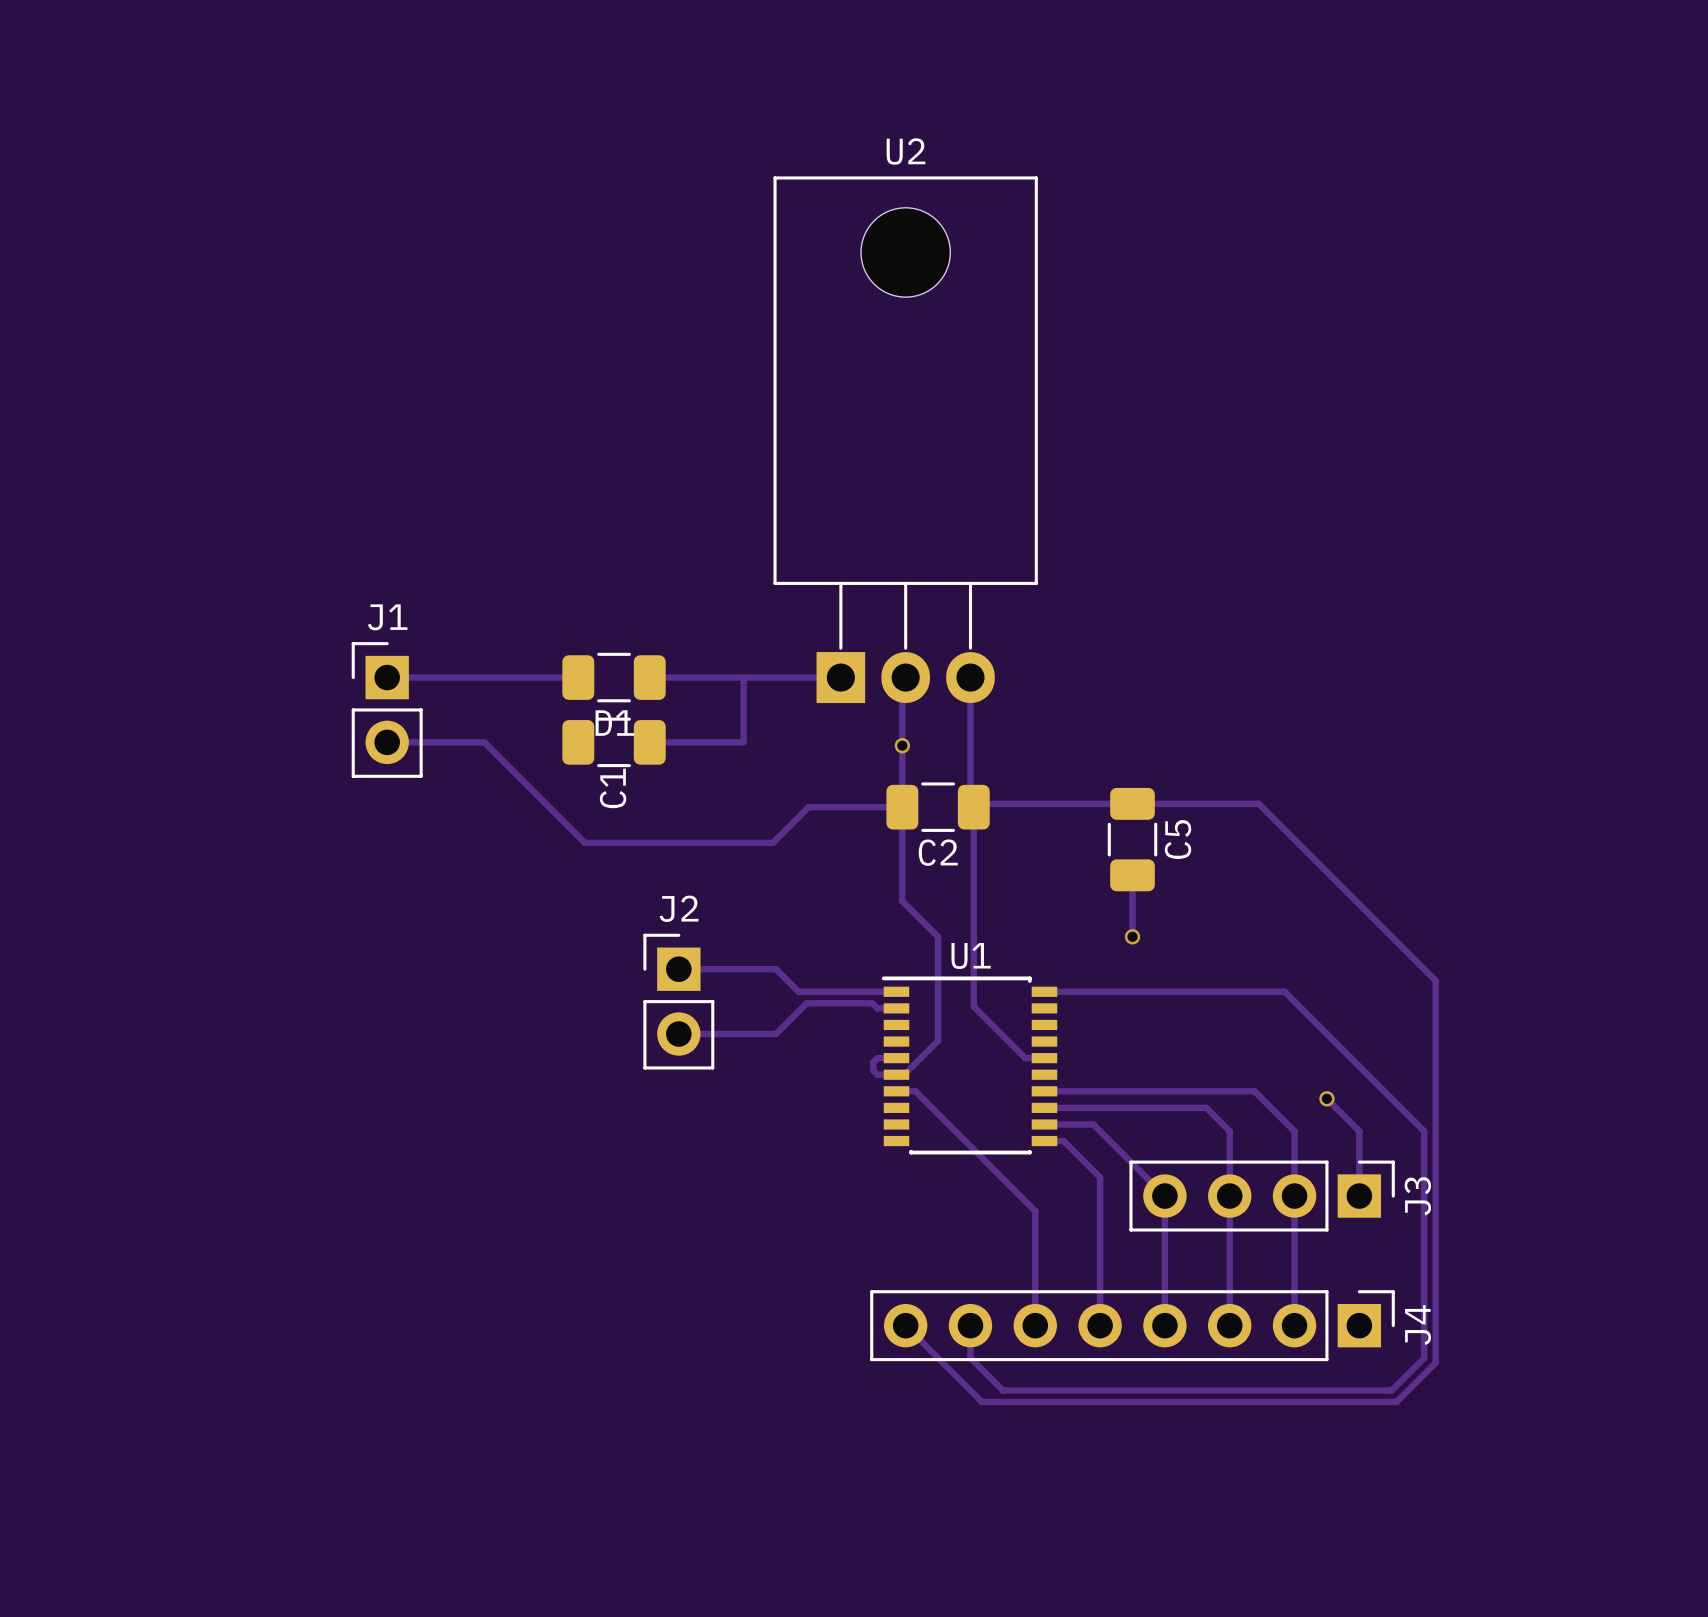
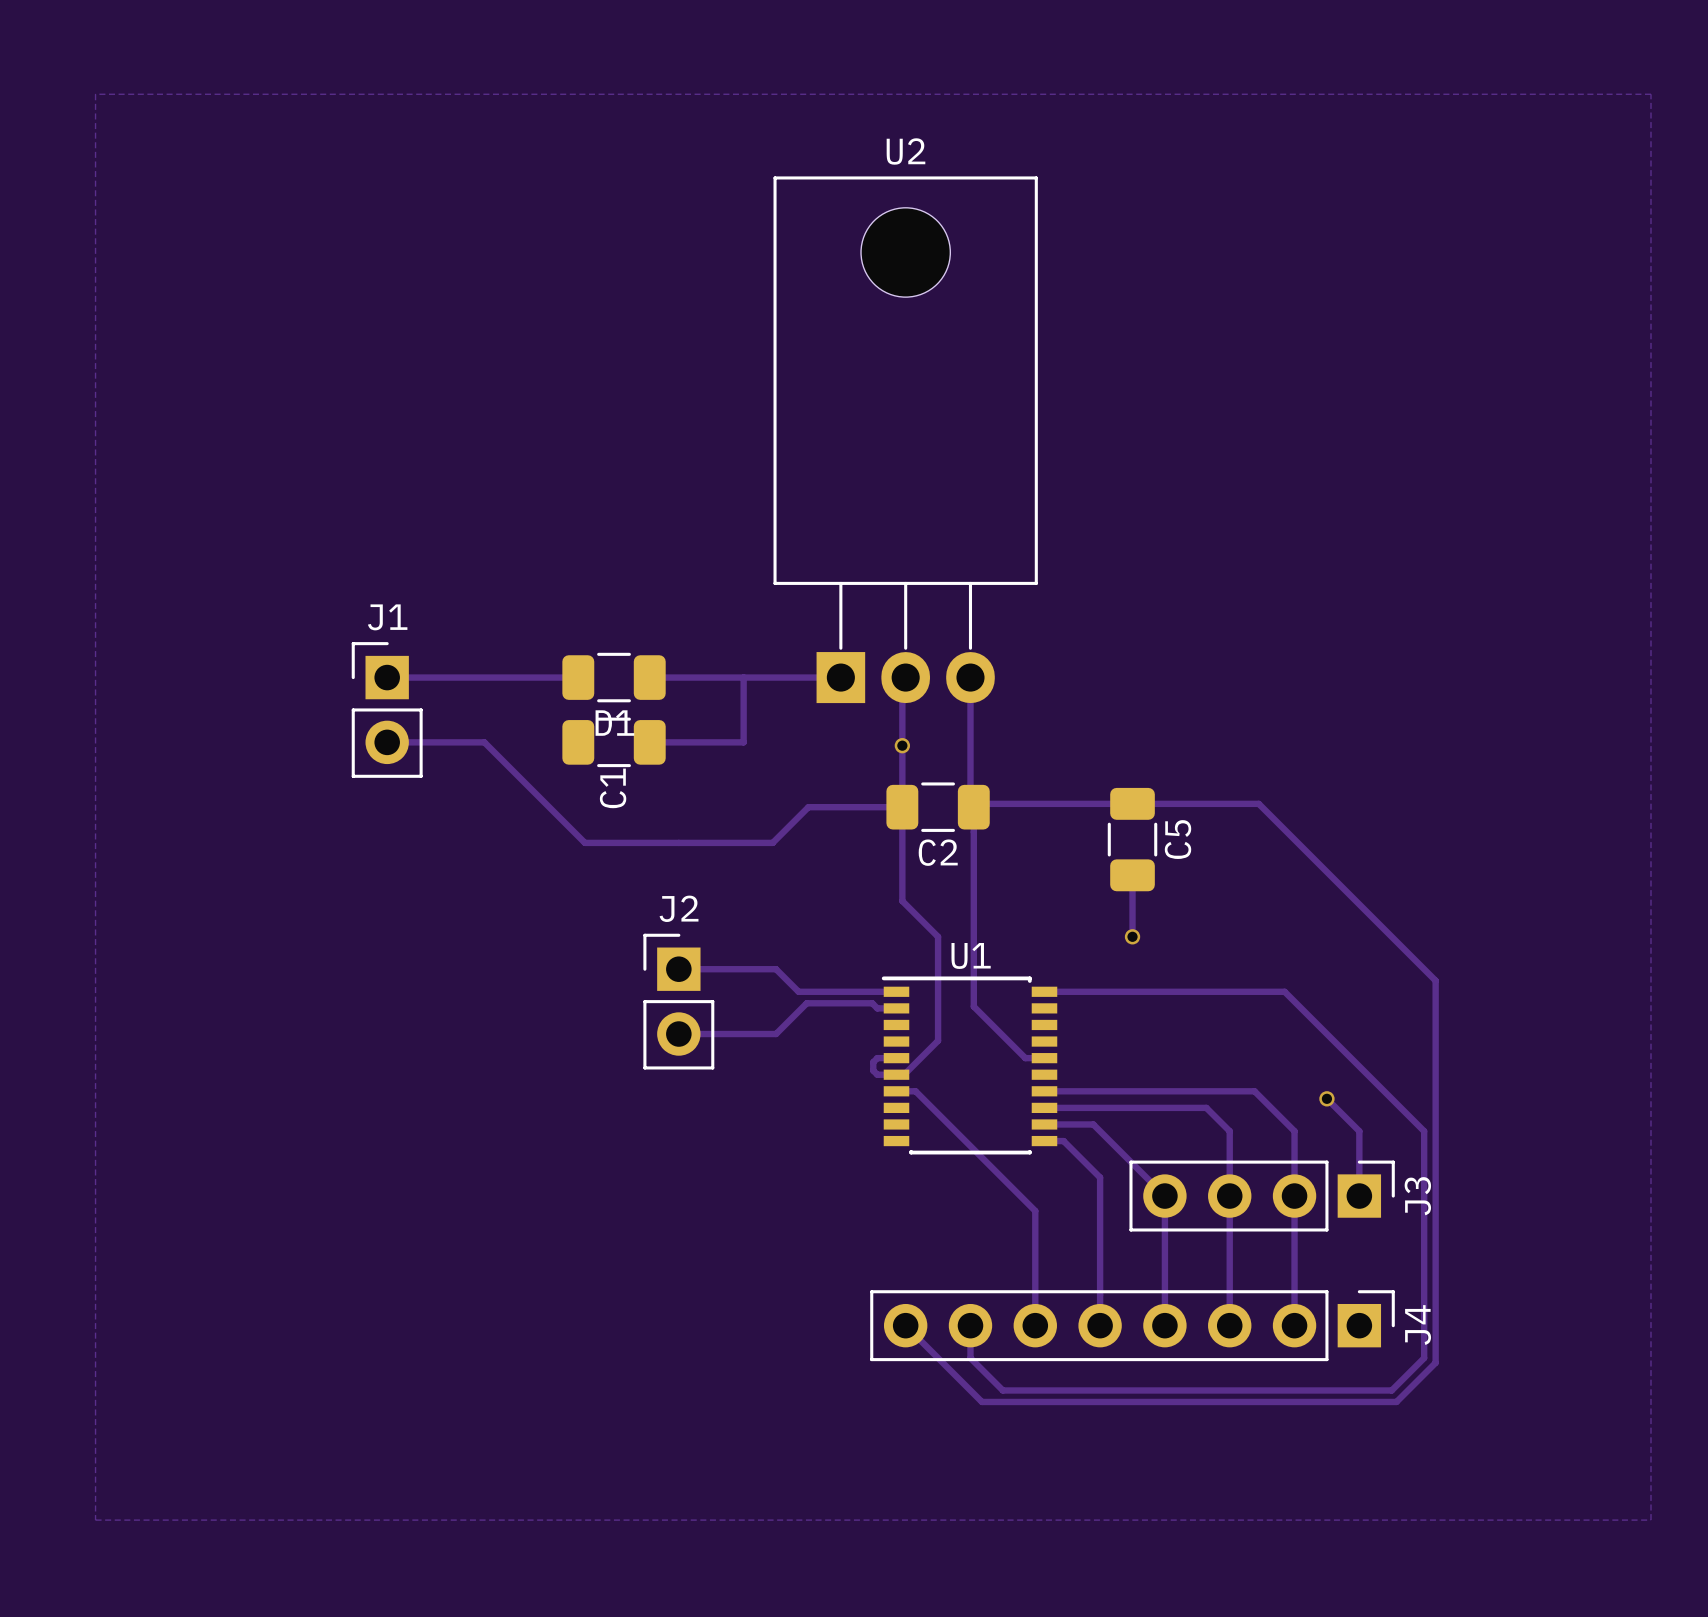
zone outline: none -> (95, 94) (1651, 94) (1651, 1520) (95, 1520) (95, 94)

